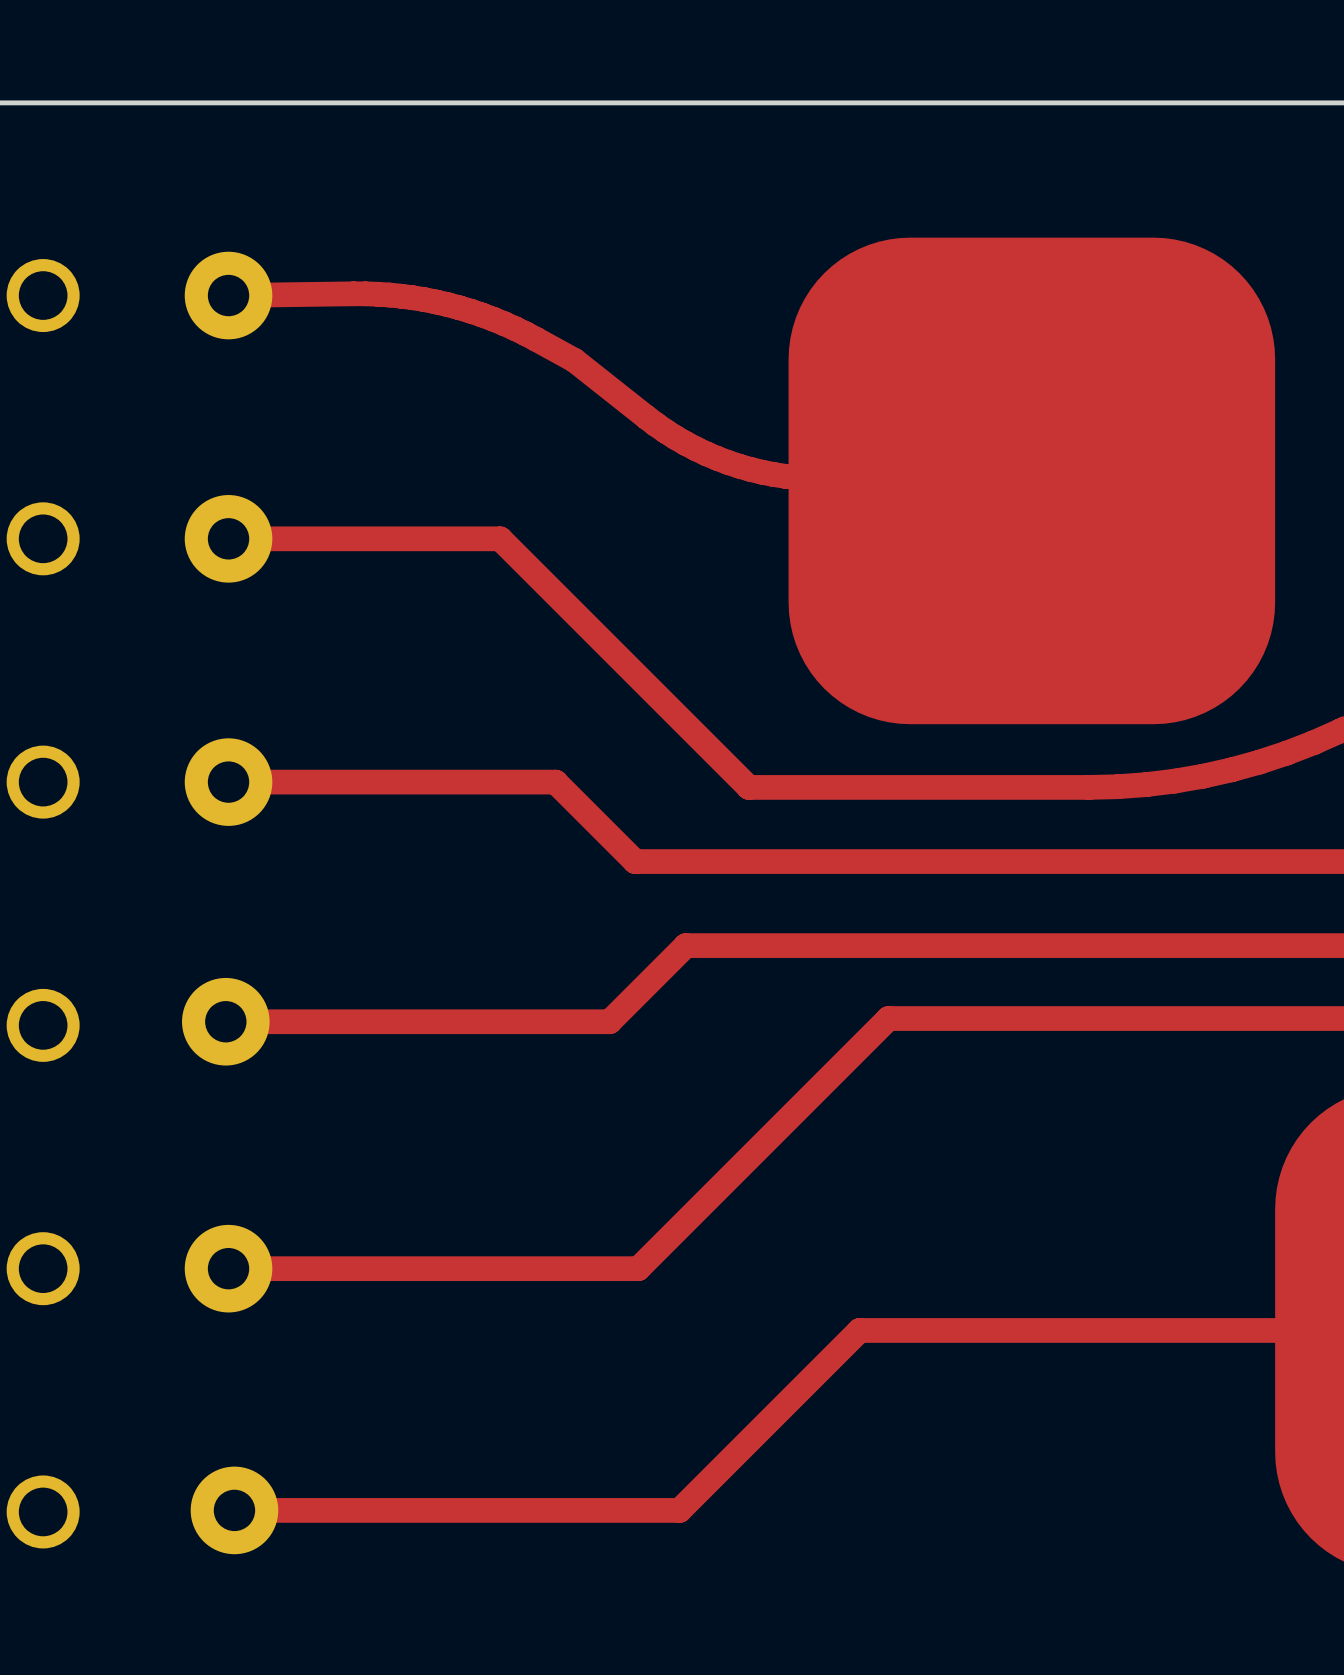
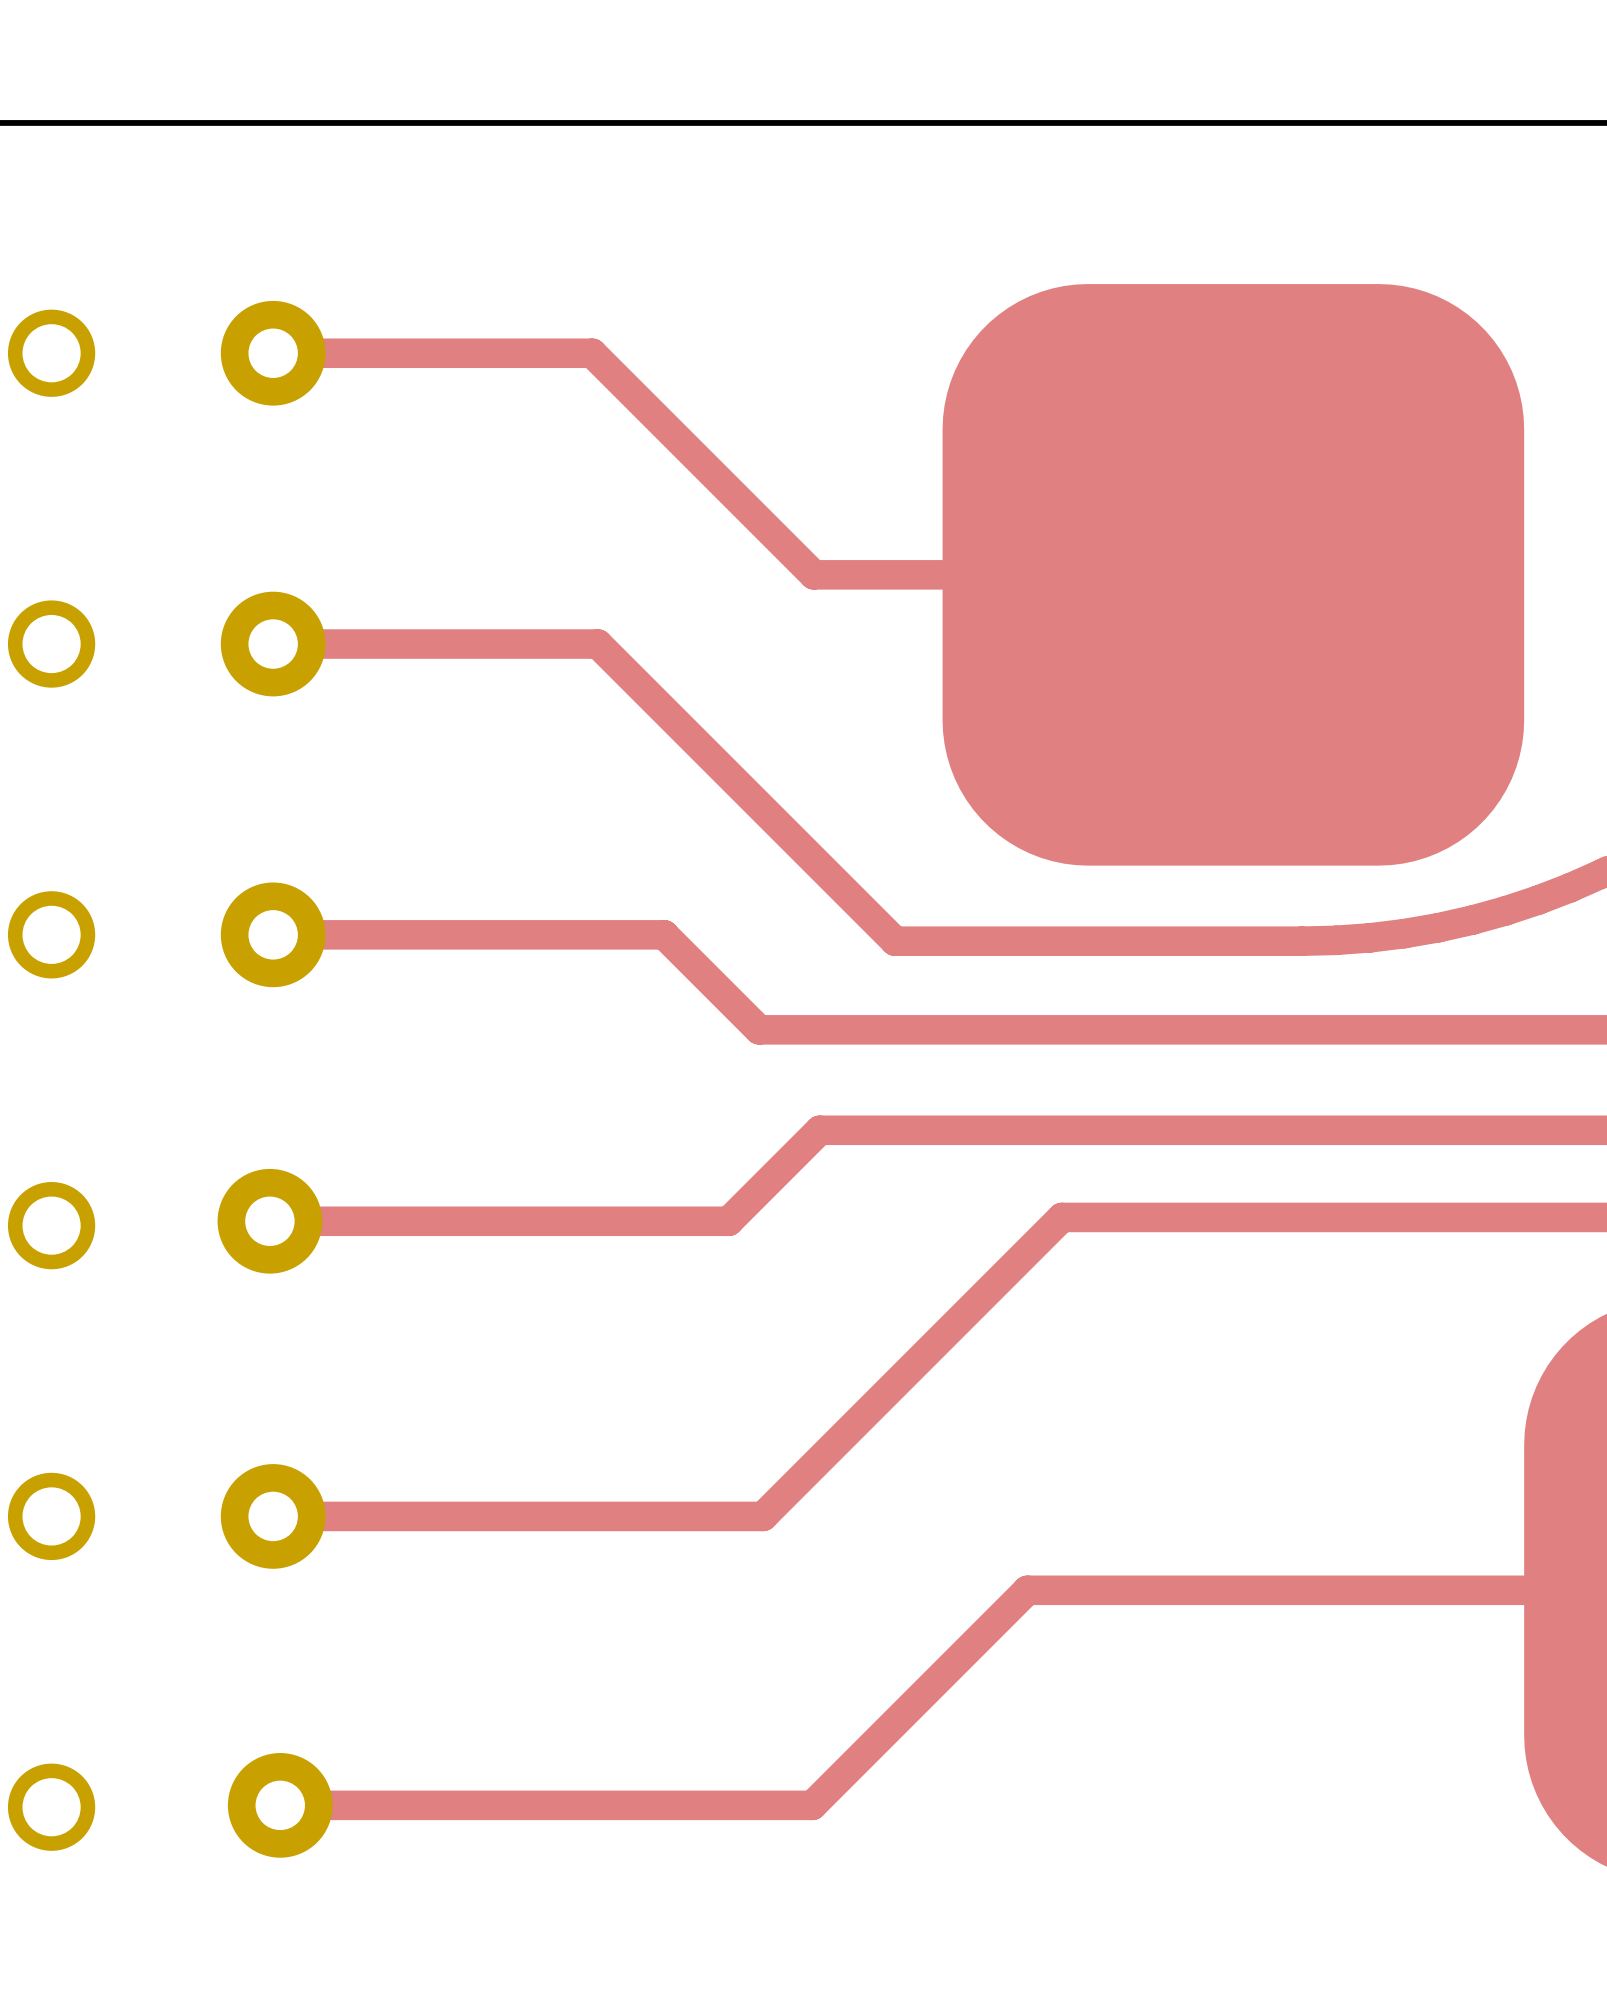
track: (228, 295) (377, 294) (424, 299) (470, 311) (515, 328) (574, 360) (655, 424) (685, 443) (717, 458) (762, 472) (808, 478) (1031, 480) -> (273, 353) (592, 353) (813, 574) (1233, 574)

